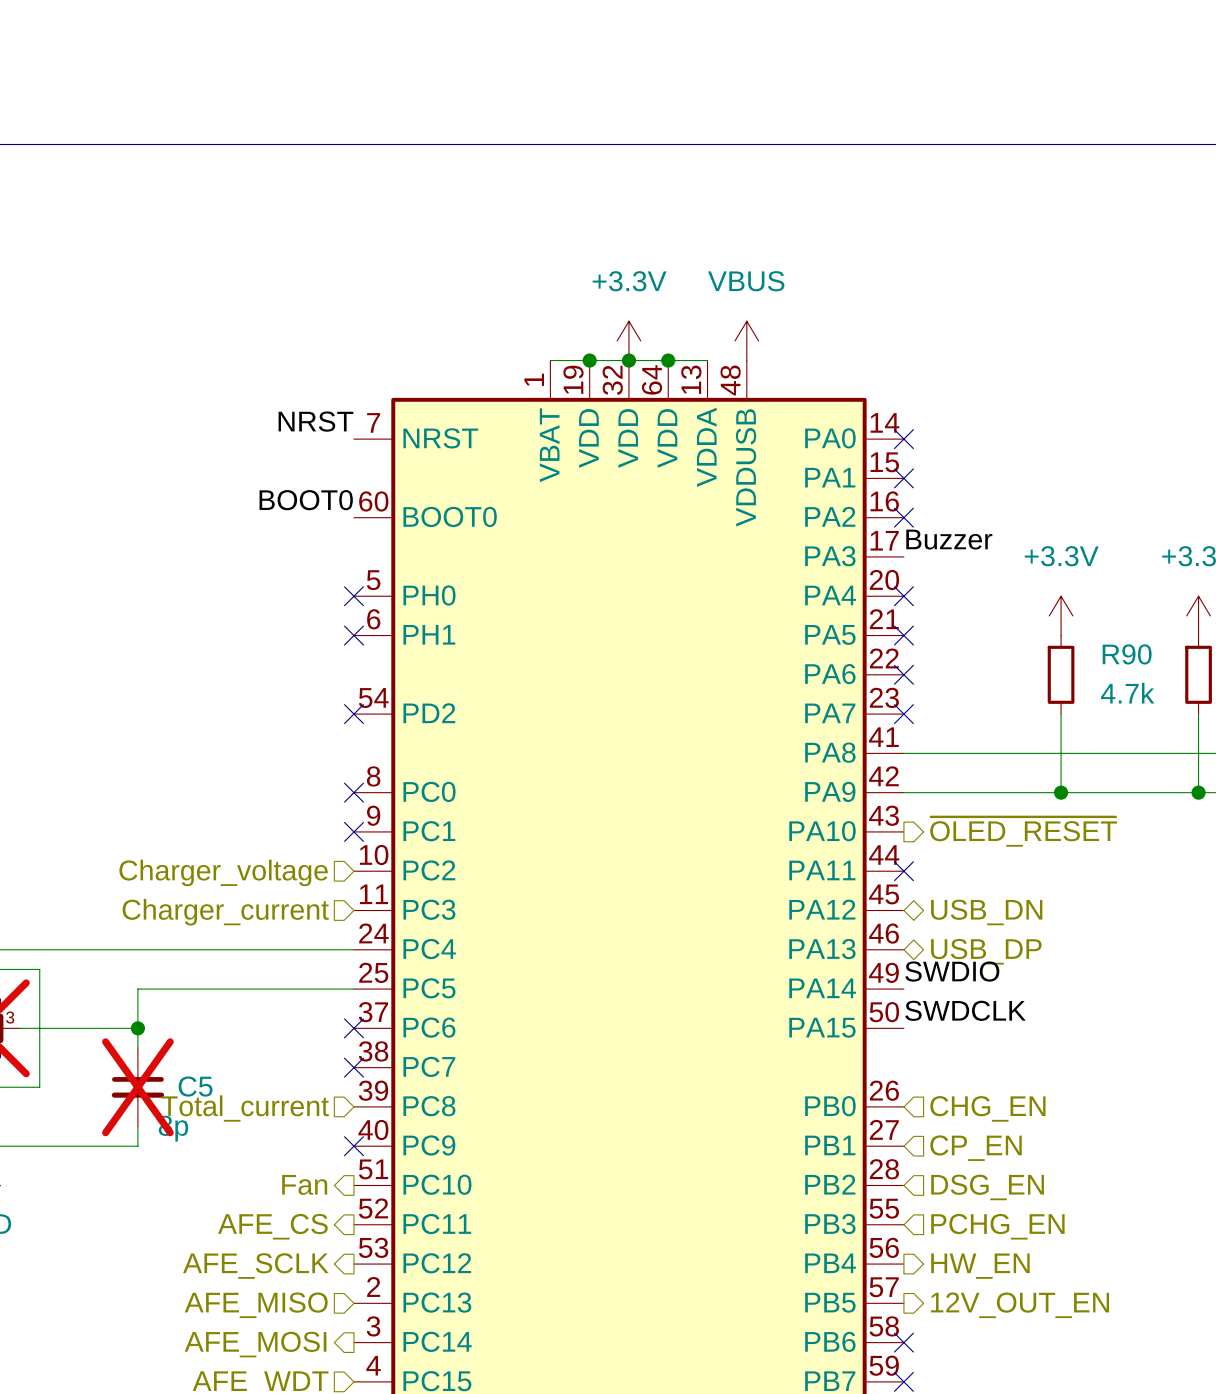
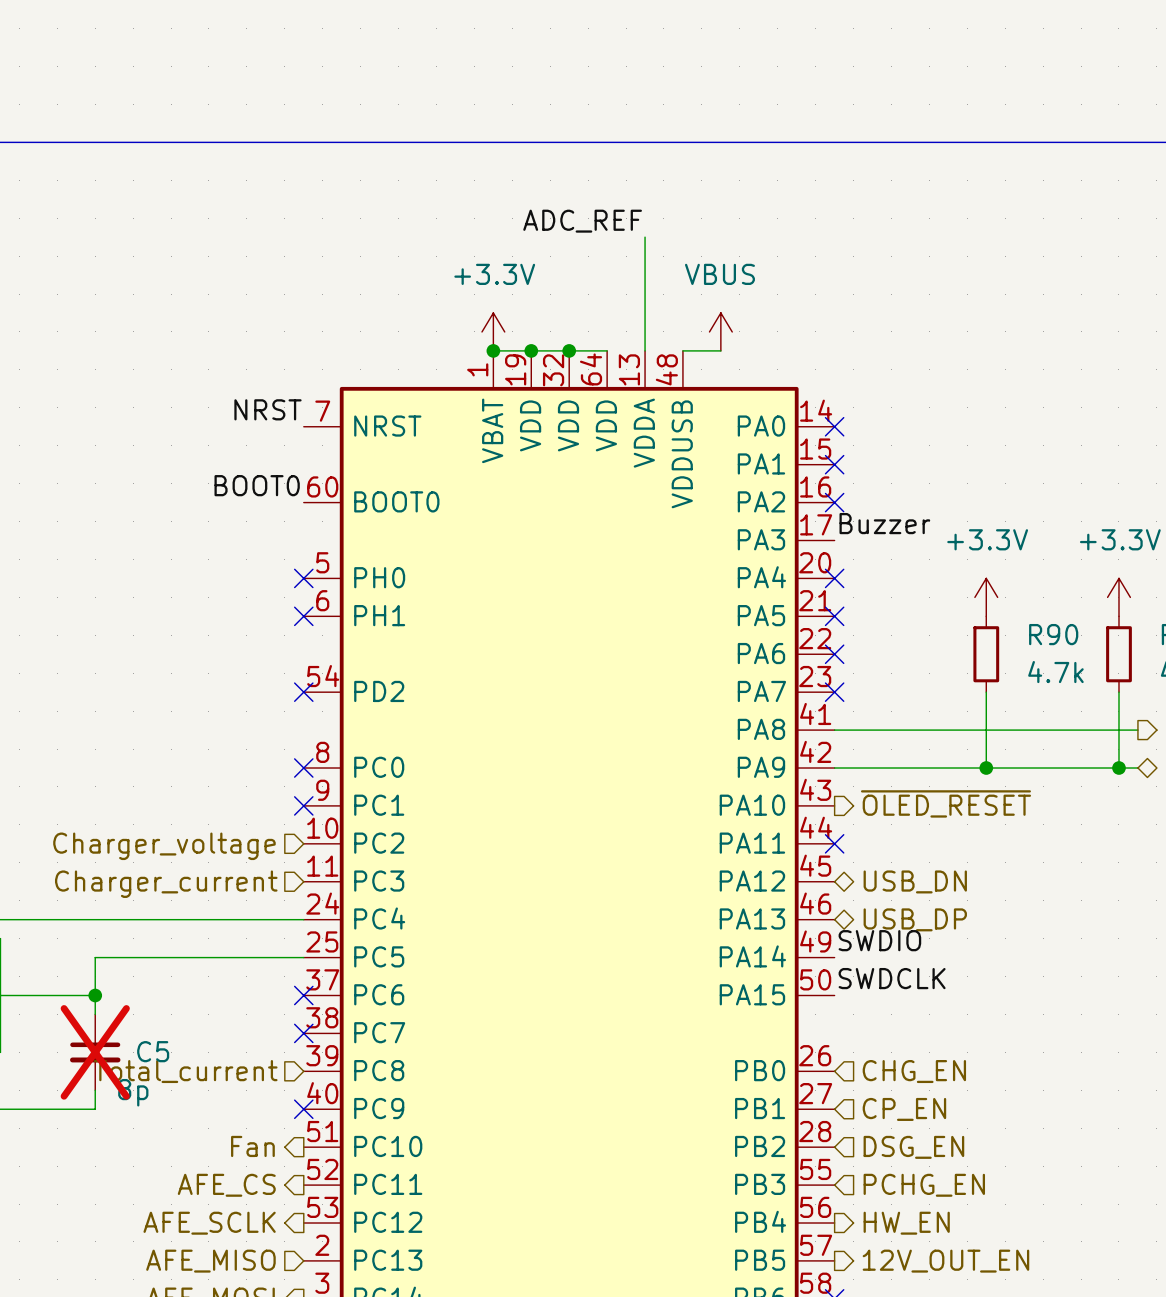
label: none -> ADC_REF (582, 221)
power symbol position: +3.3V (628, 340) -> +3.3V (493, 331)
power symbol position: VBUS (746, 340) -> VBUS (720, 331)
junction: none -> (493, 350)
wire: (668, 360) (707, 360) -> (645, 237) (645, 350)
junction: (668, 360) -> none
wire: none -> (682, 350) (720, 350)

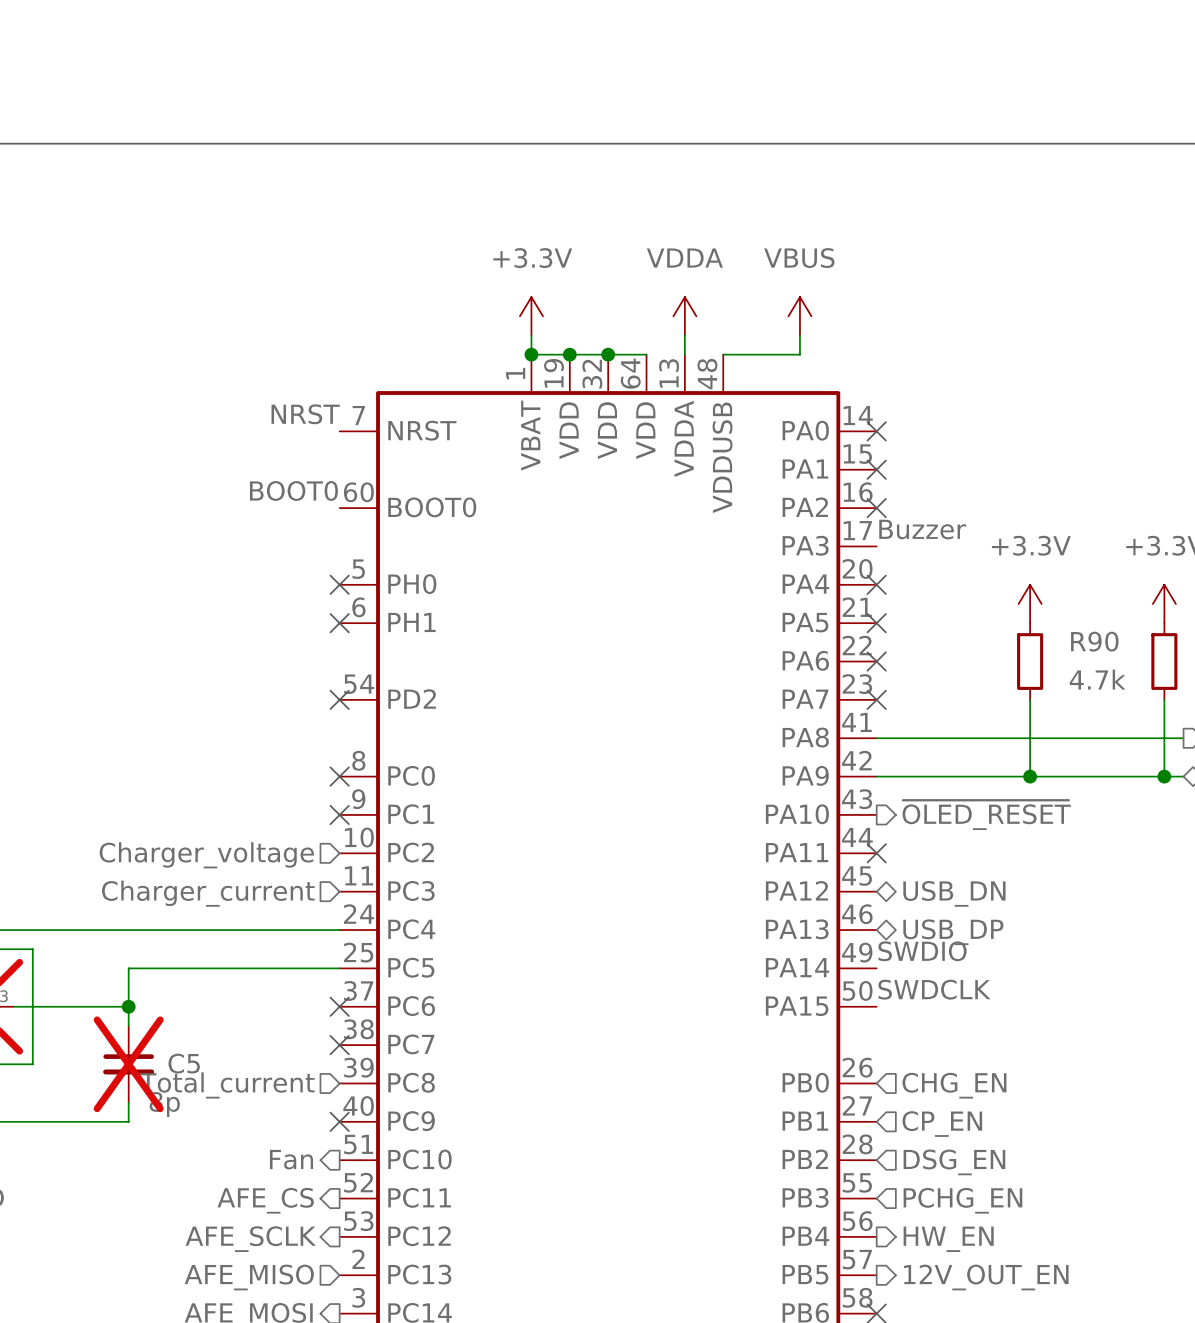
label: ADC_REF (582, 221) -> none
wire: (645, 237) (645, 331) -> none
power symbol: none -> VDDA (684, 316)
power symbol position: +3.3V (493, 331) -> +3.3V (531, 316)
power symbol position: VBUS (720, 331) -> VBUS (799, 316)
wire: none -> (799, 335) (799, 354) (761, 354)

